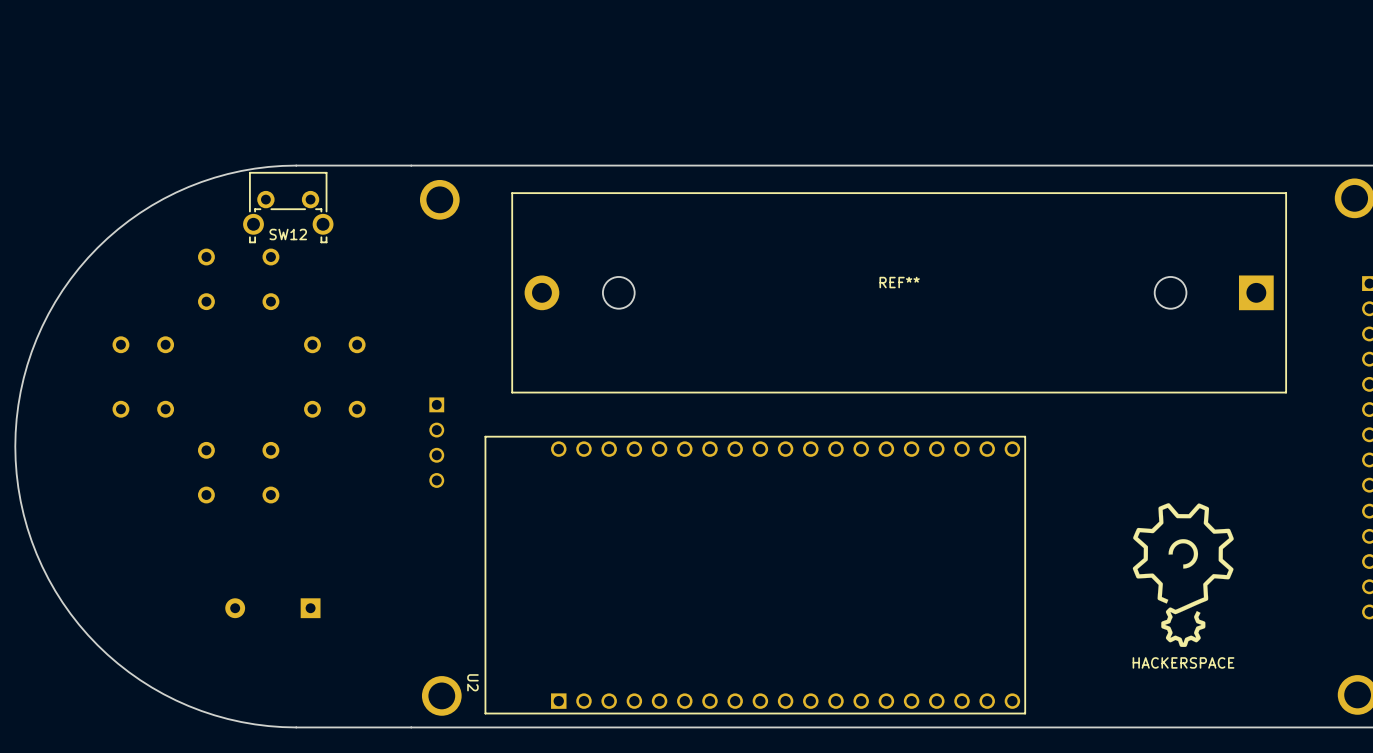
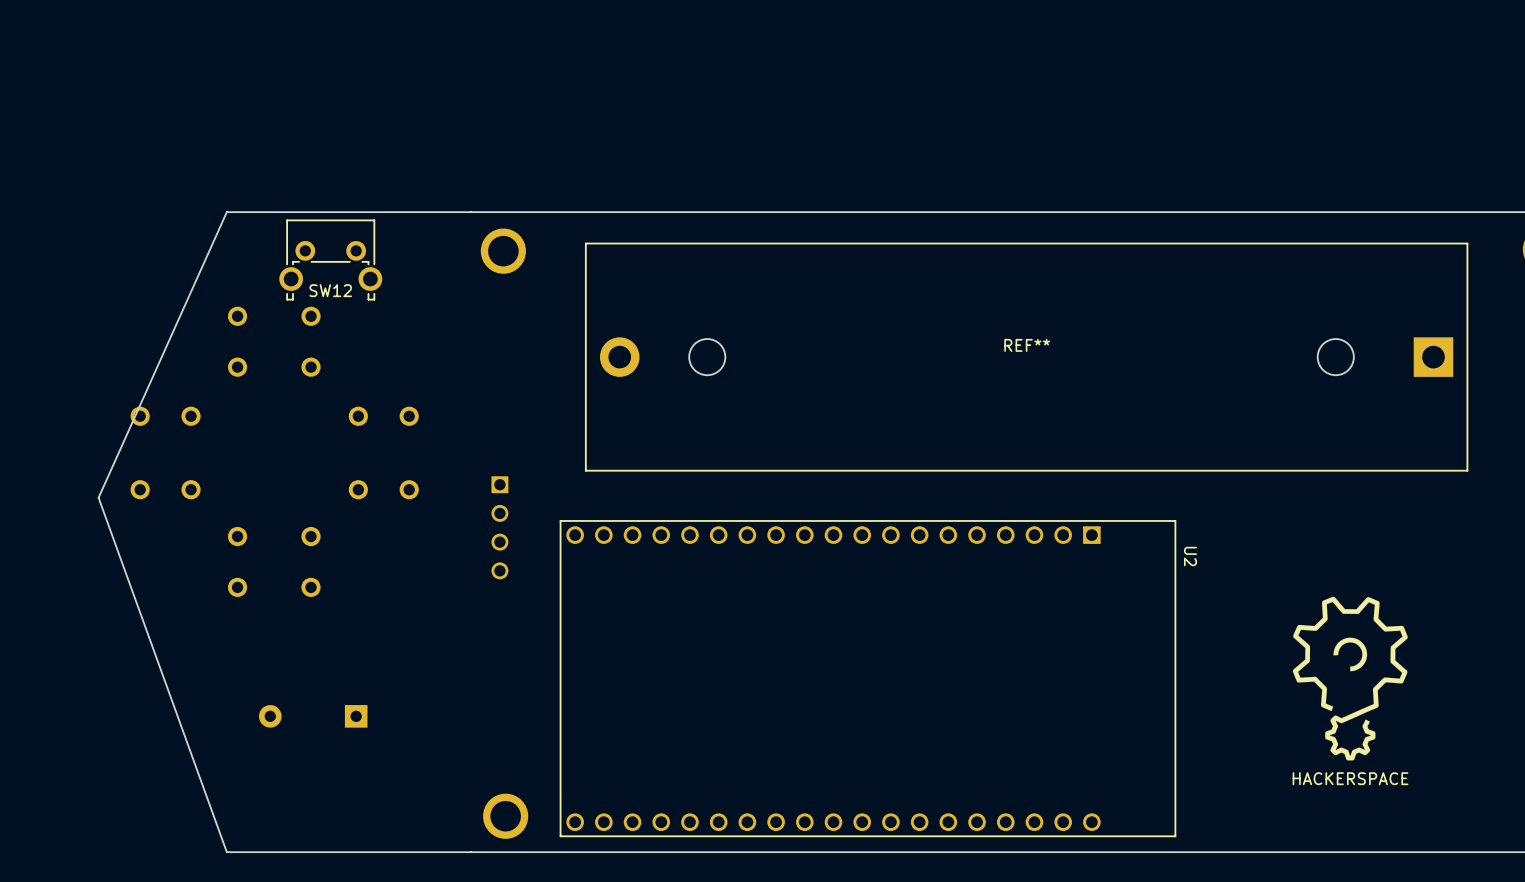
board edge: (296, 165) (241, 170) (188, 186) (140, 212) (97, 247) (62, 290) (36, 338) (20, 391) (15, 446) (20, 501) (36, 554) (62, 602) (97, 645) (140, 680) (188, 706) (241, 722) (296, 727) -> (339, 212) (226, 212) (98, 497) (226, 852) (339, 852)
U2 rotation: 0° (755, 575) -> 180° (867, 678)

